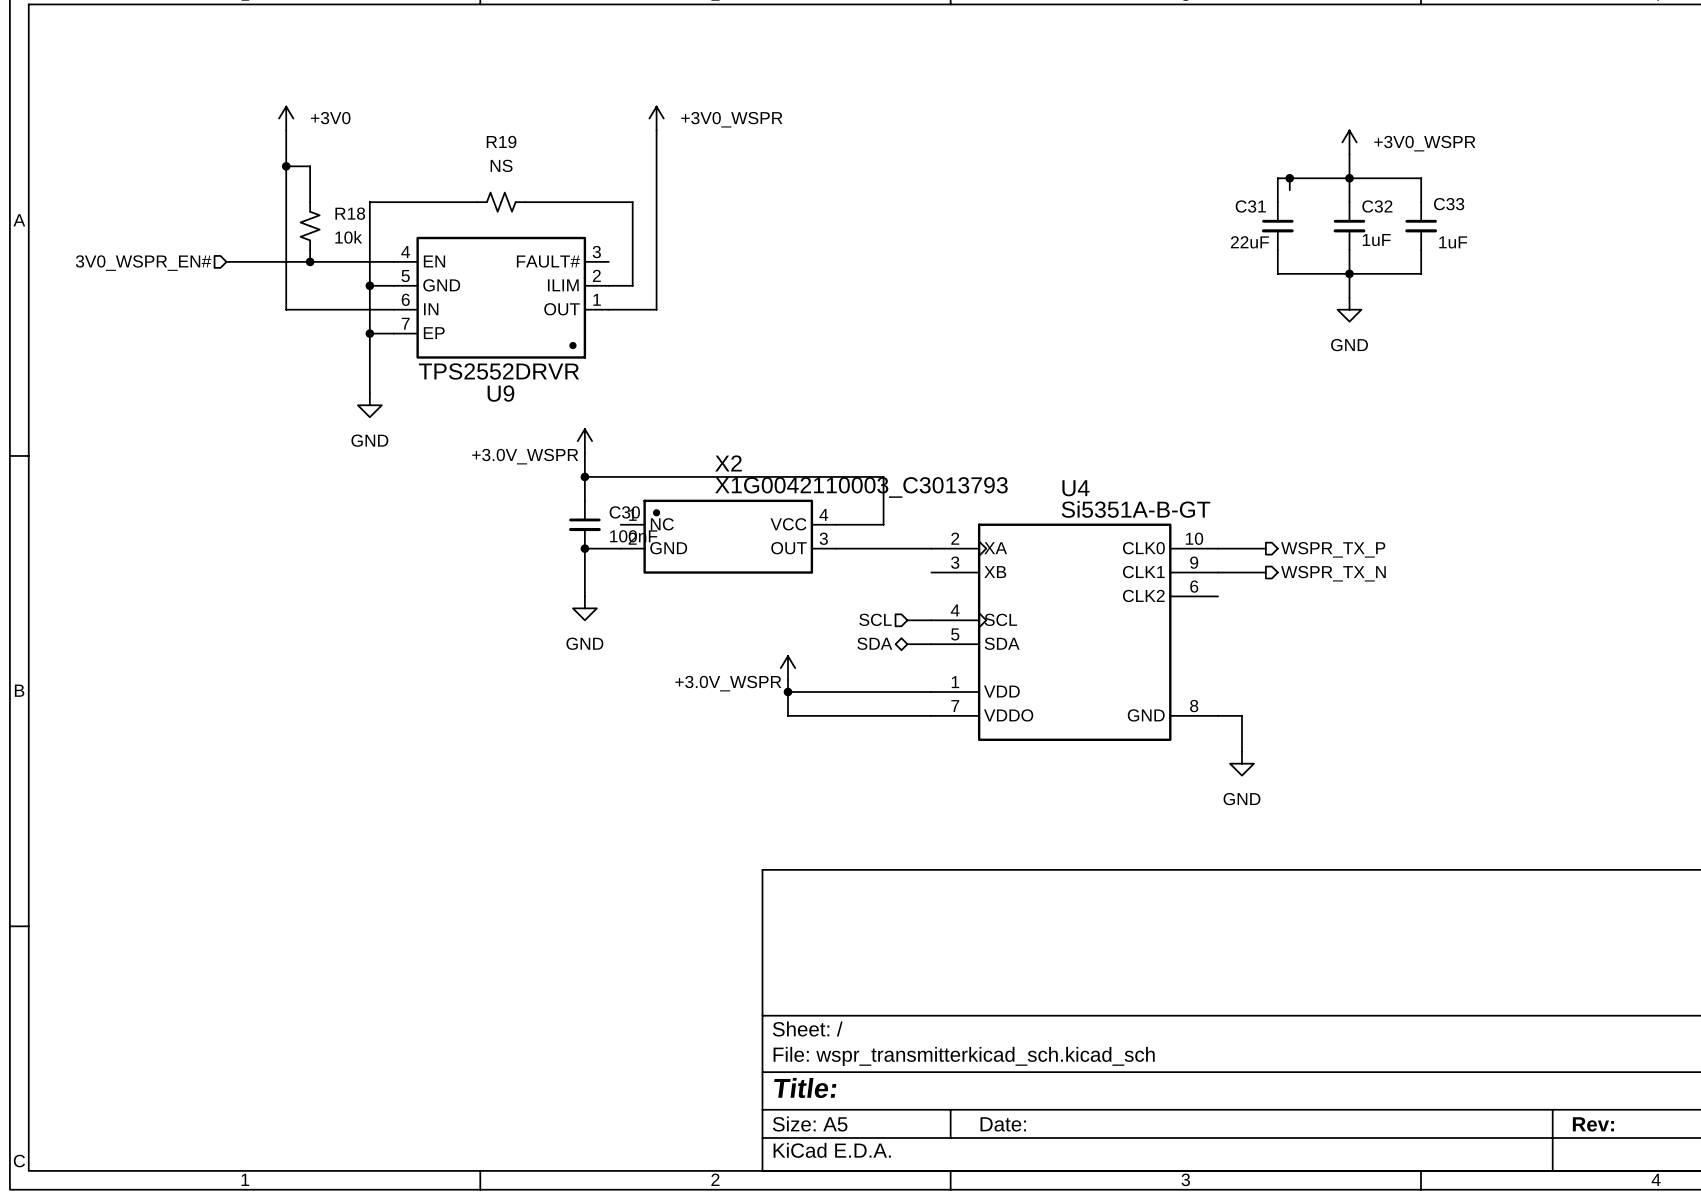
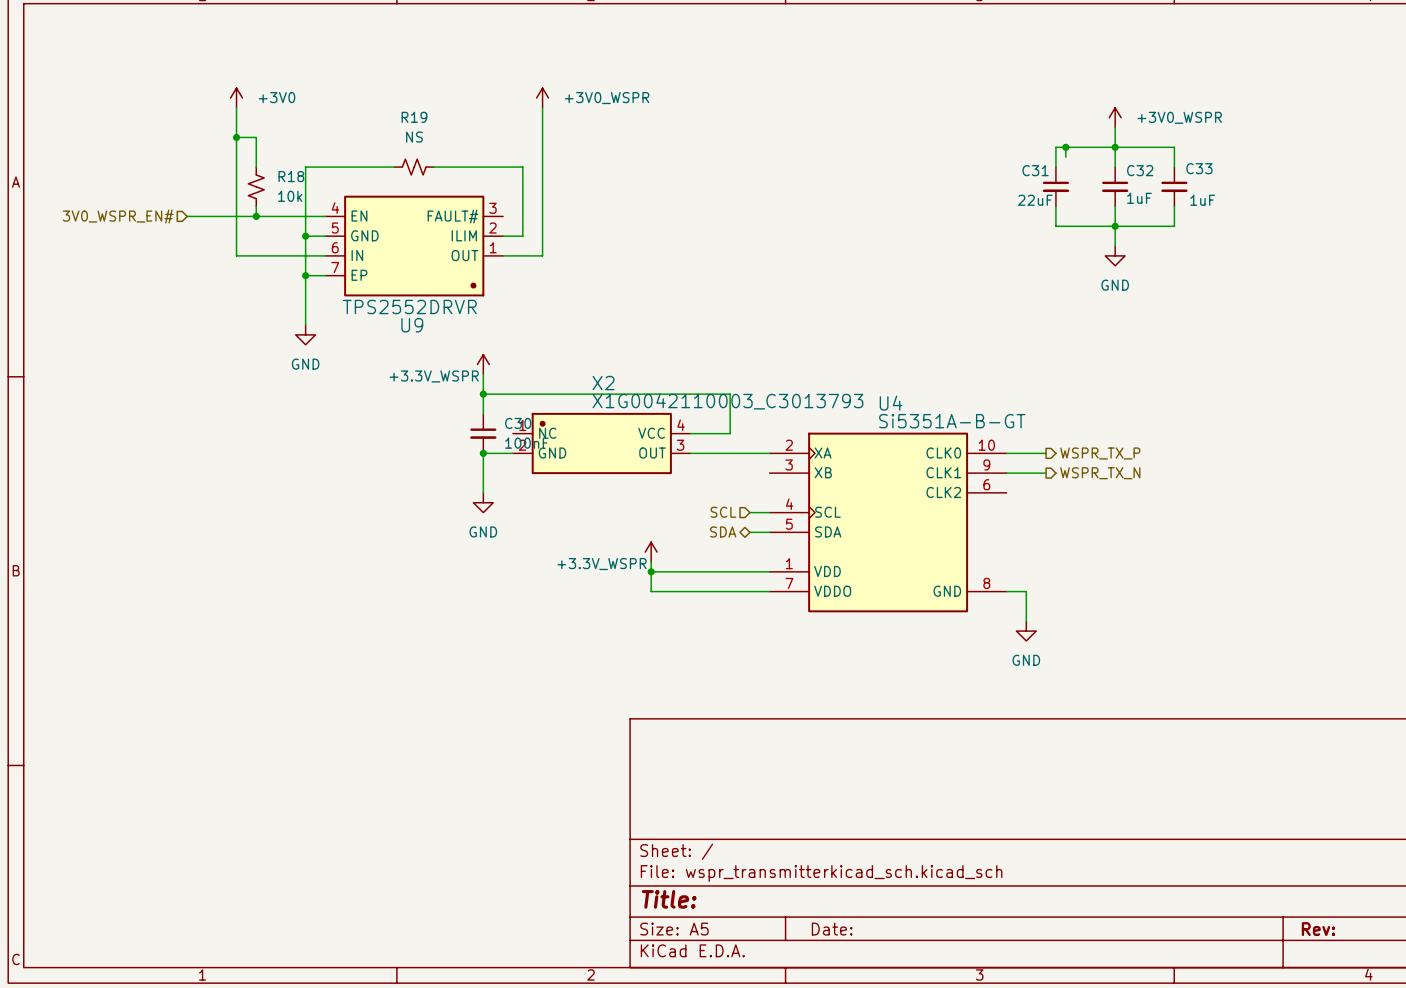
power symbol: +3.0V_WSPR (584, 441) -> +3.3V_WSPR (483, 364)
power symbol: +3.0V_WSPR (787, 668) -> +3.3V_WSPR (651, 552)

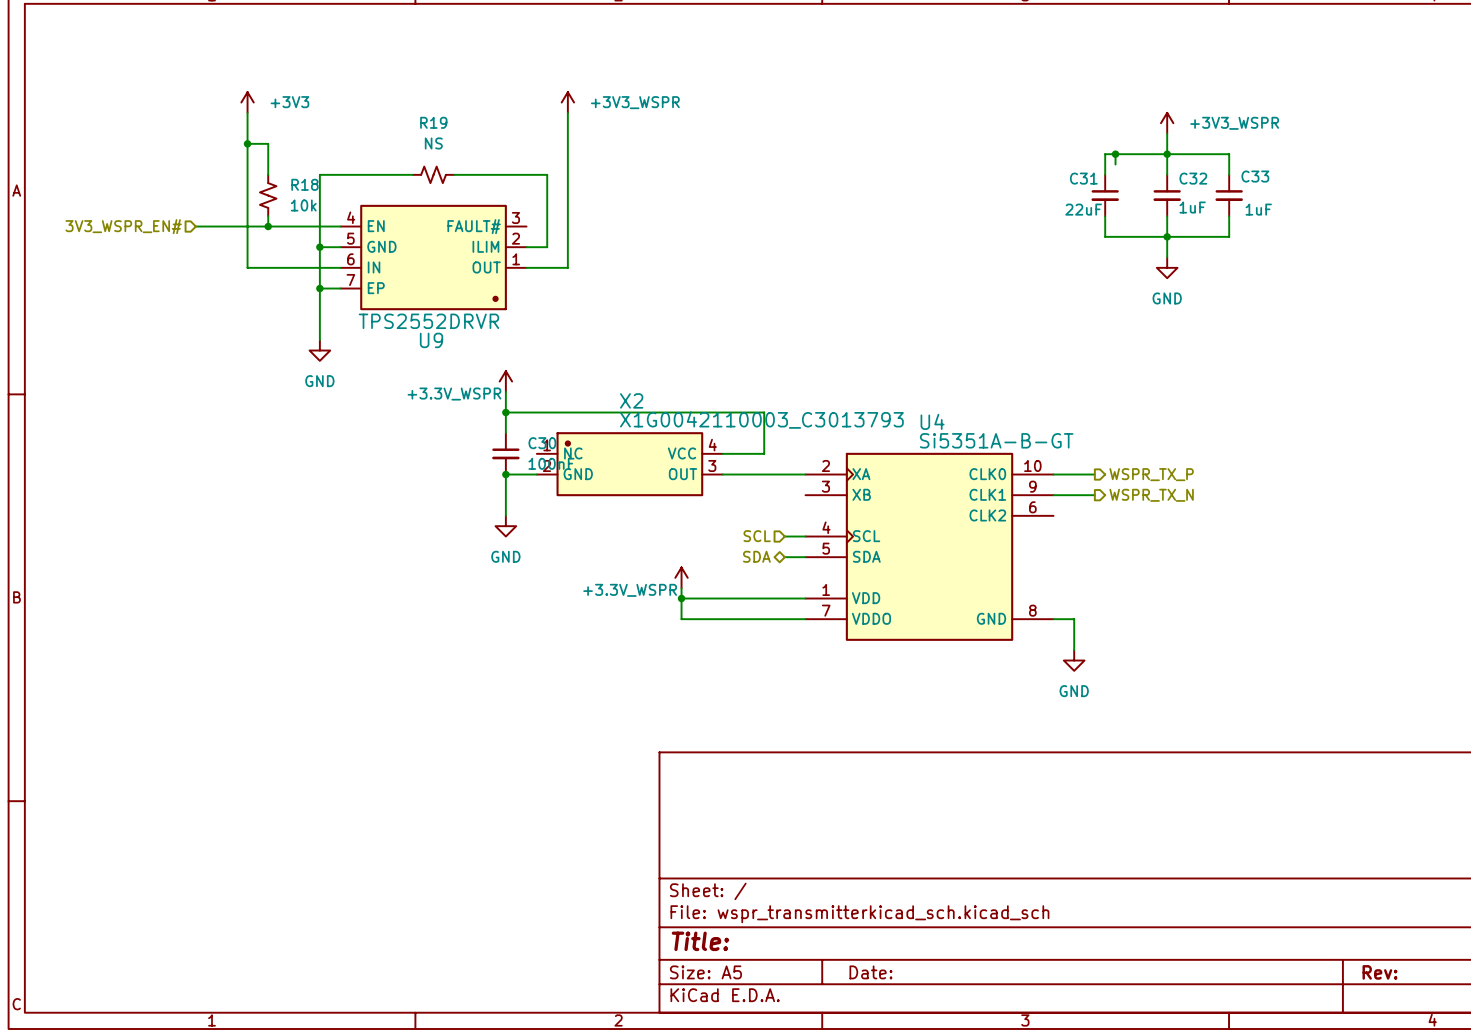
power symbol: +3V0 (236, 97) -> +3V3 (247, 102)
power symbol: +3V0_WSPR (542, 97) -> +3V3_WSPR (567, 102)
power symbol: +3V0_WSPR (1115, 117) -> +3V3_WSPR (1167, 123)
hierarchical label: 3V0_WSPR_EN# (118, 216) -> 3V3_WSPR_EN# (123, 226)

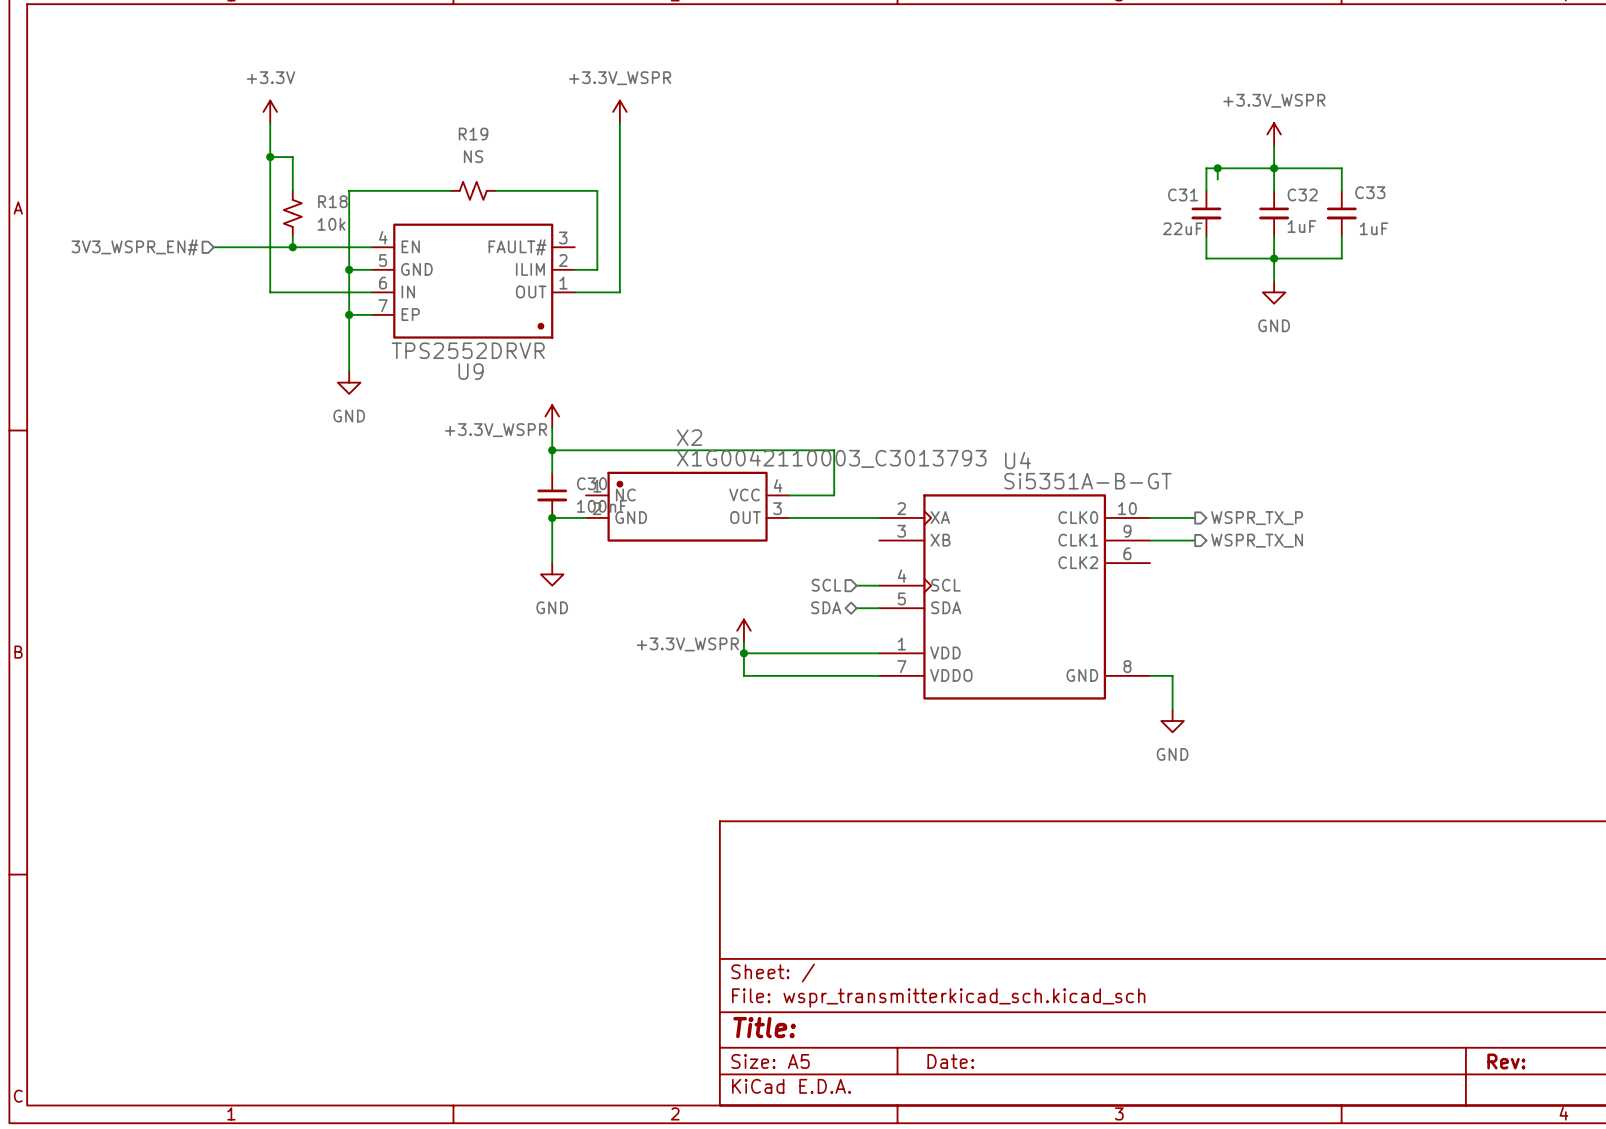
power symbol: +3V3 (247, 102) -> +3.3V (270, 111)
power symbol: +3V3_WSPR (567, 102) -> +3.3V_WSPR (619, 111)
power symbol: +3V3_WSPR (1167, 123) -> +3.3V_WSPR (1274, 134)

